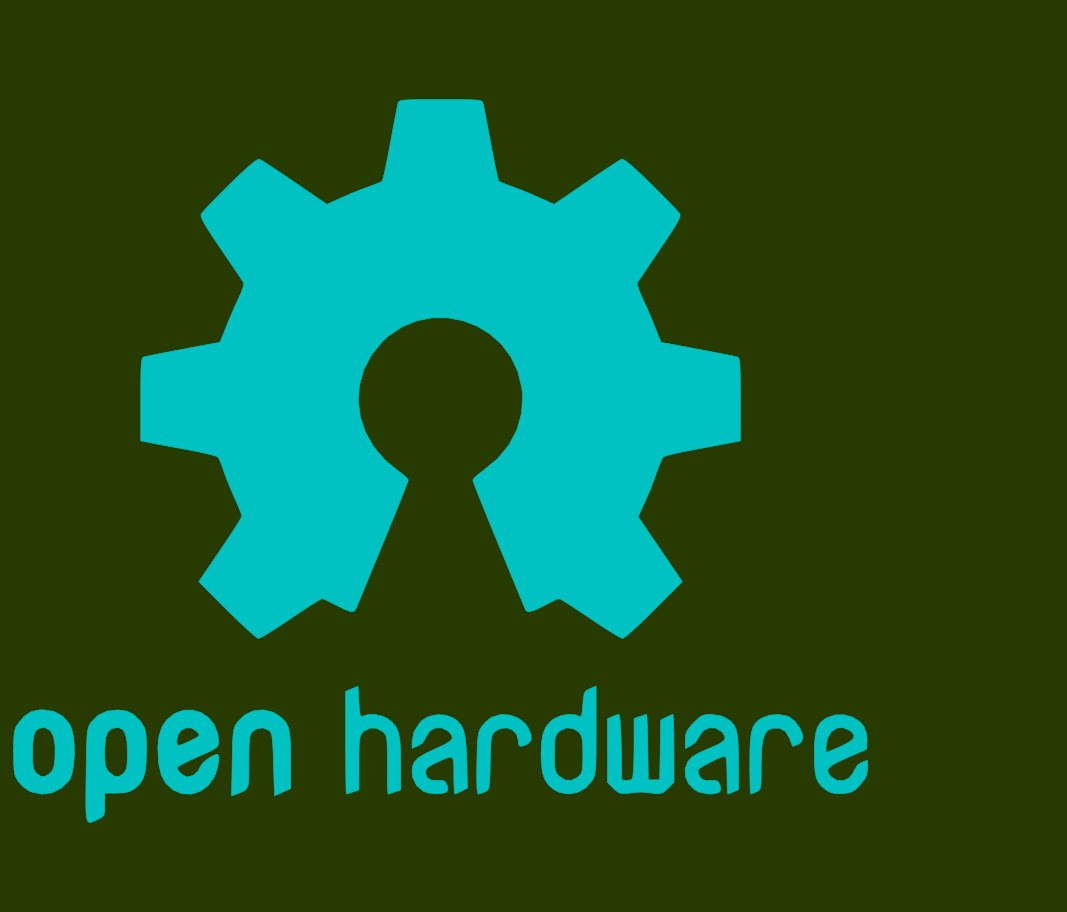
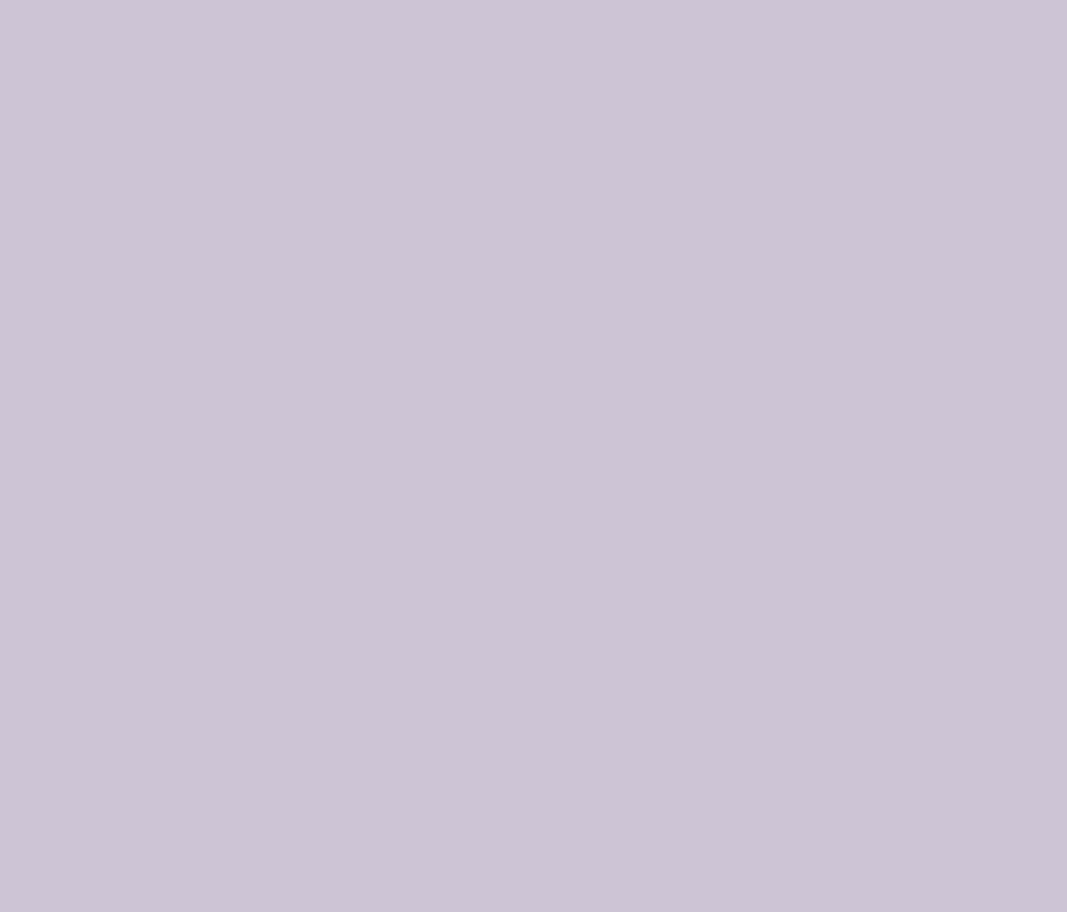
drawing: [13, 99, 868, 823] -> none

